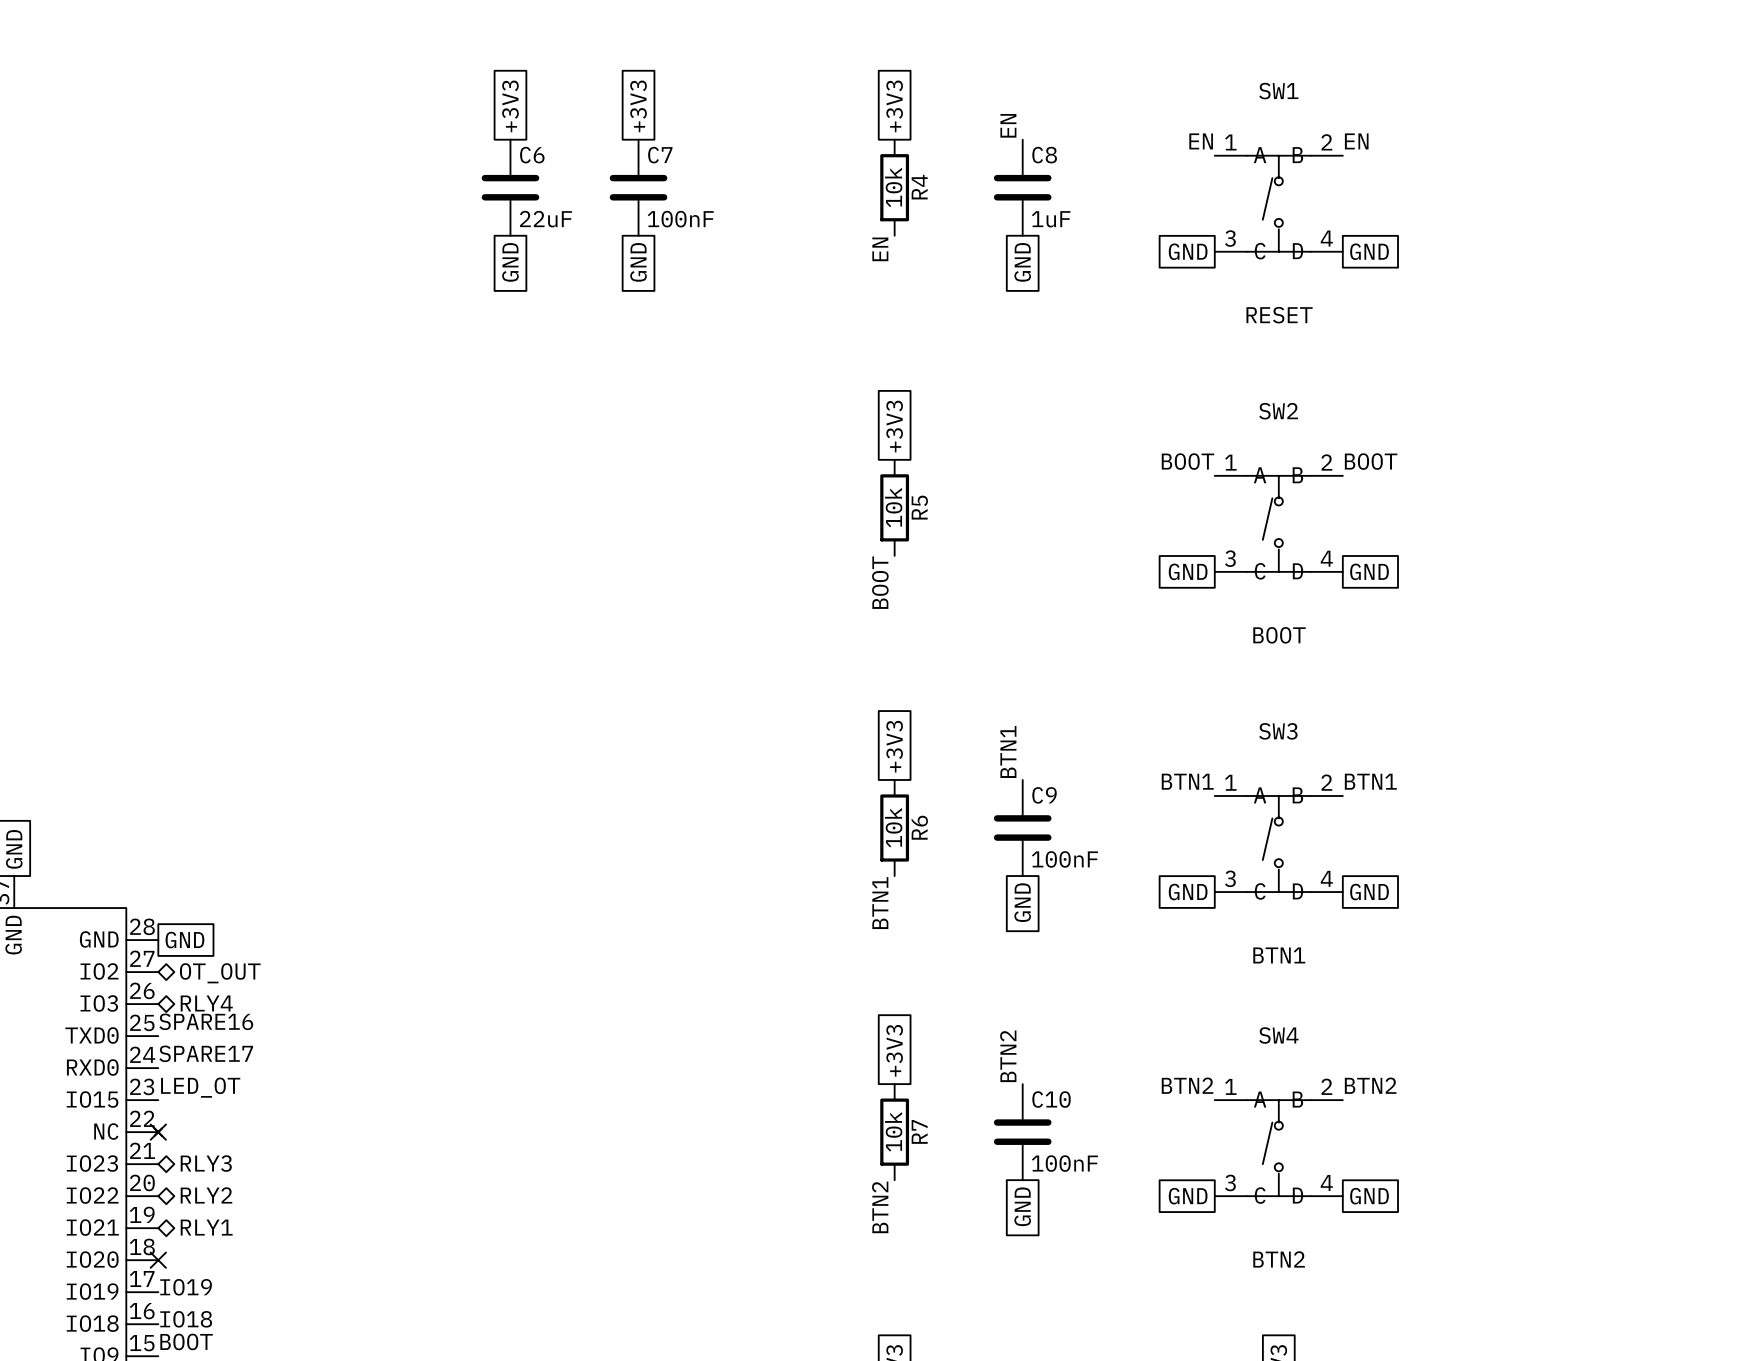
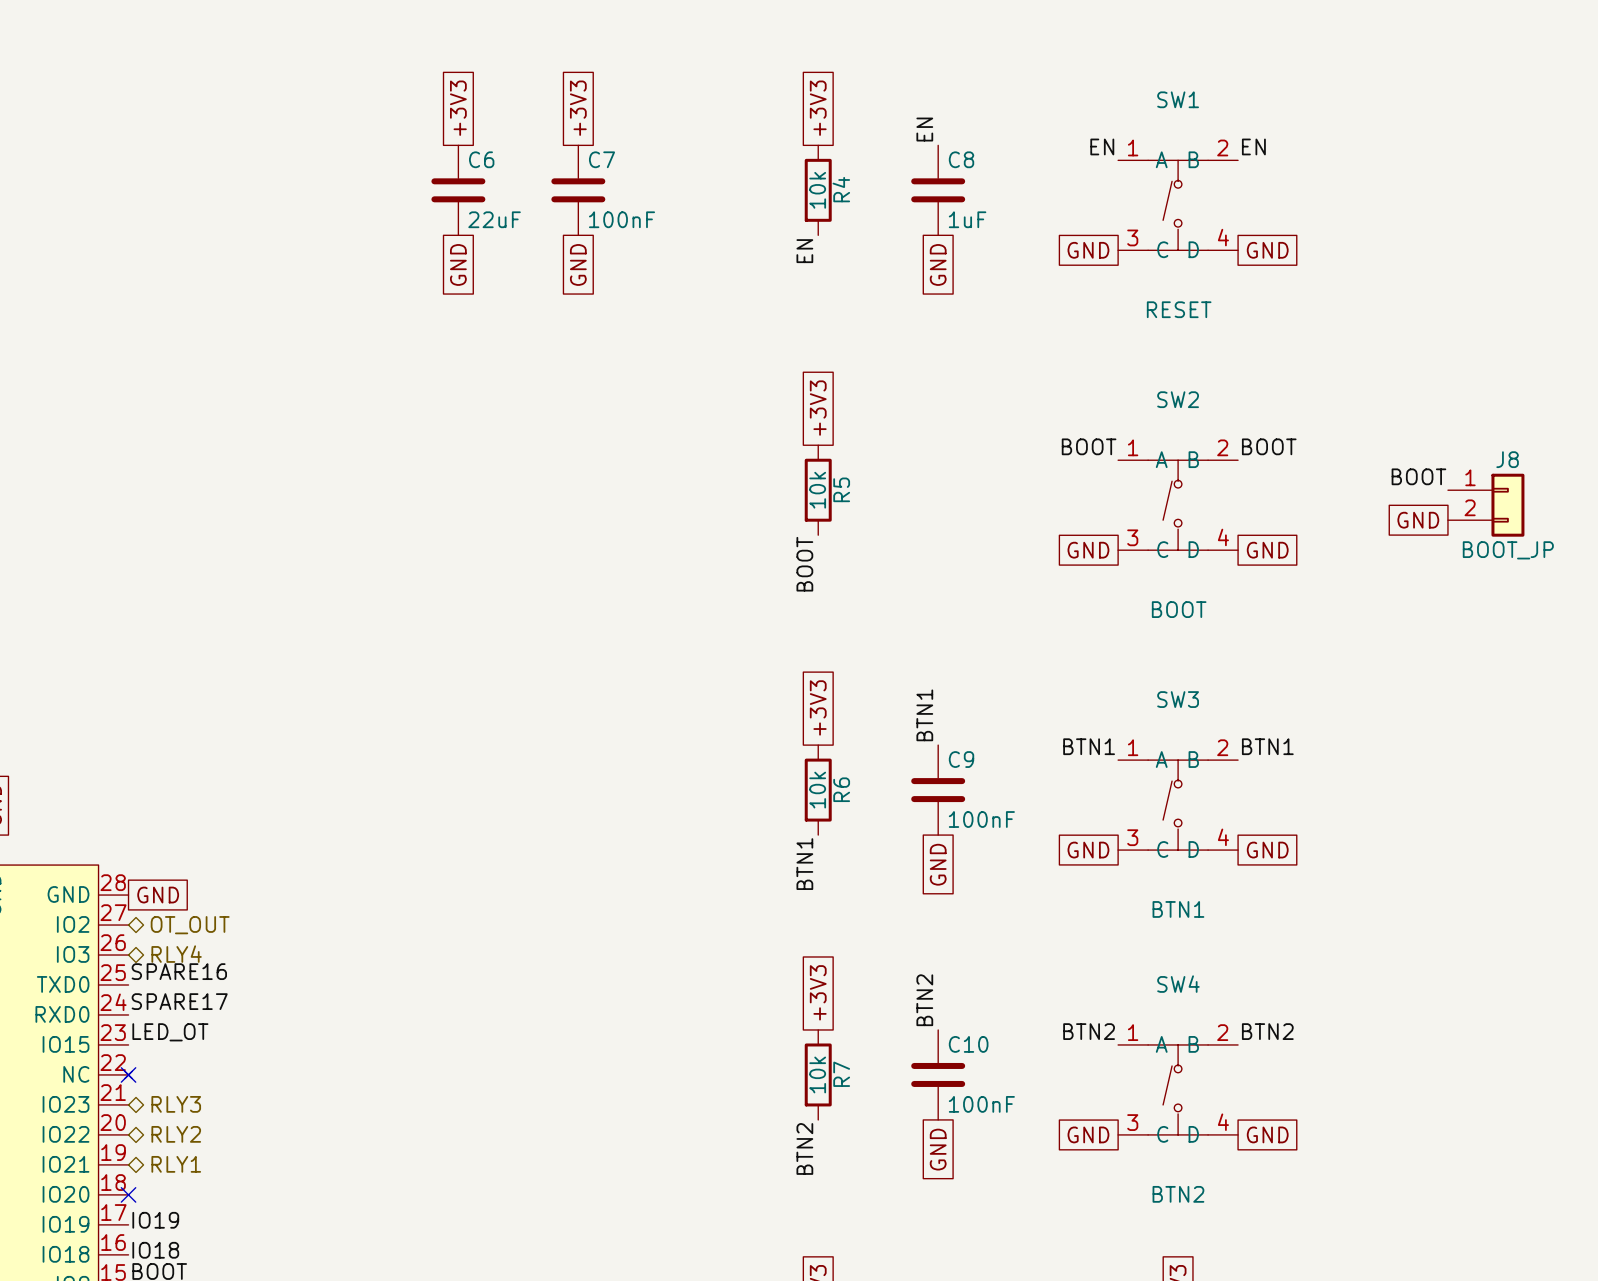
label: none -> BOOT (1418, 476)
J8: none -> BOOT_JP (1486, 505)
global label: none -> GND (1418, 520)

